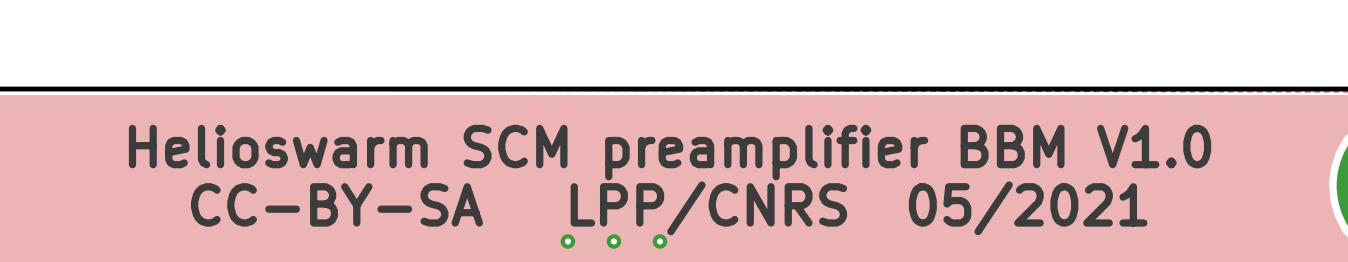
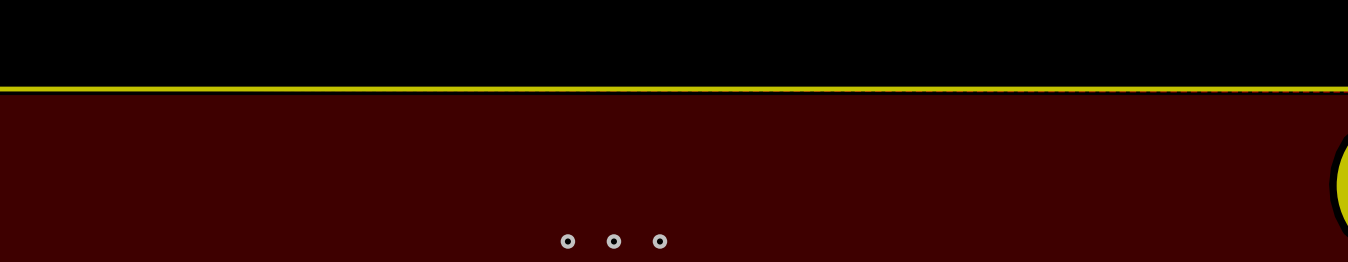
text: Helioswarm SCM preamplifier BBM V1.0 (670, 152) -> none
text: CC-BY-SA LPP/CNRS 05/2021 (669, 208) -> none

